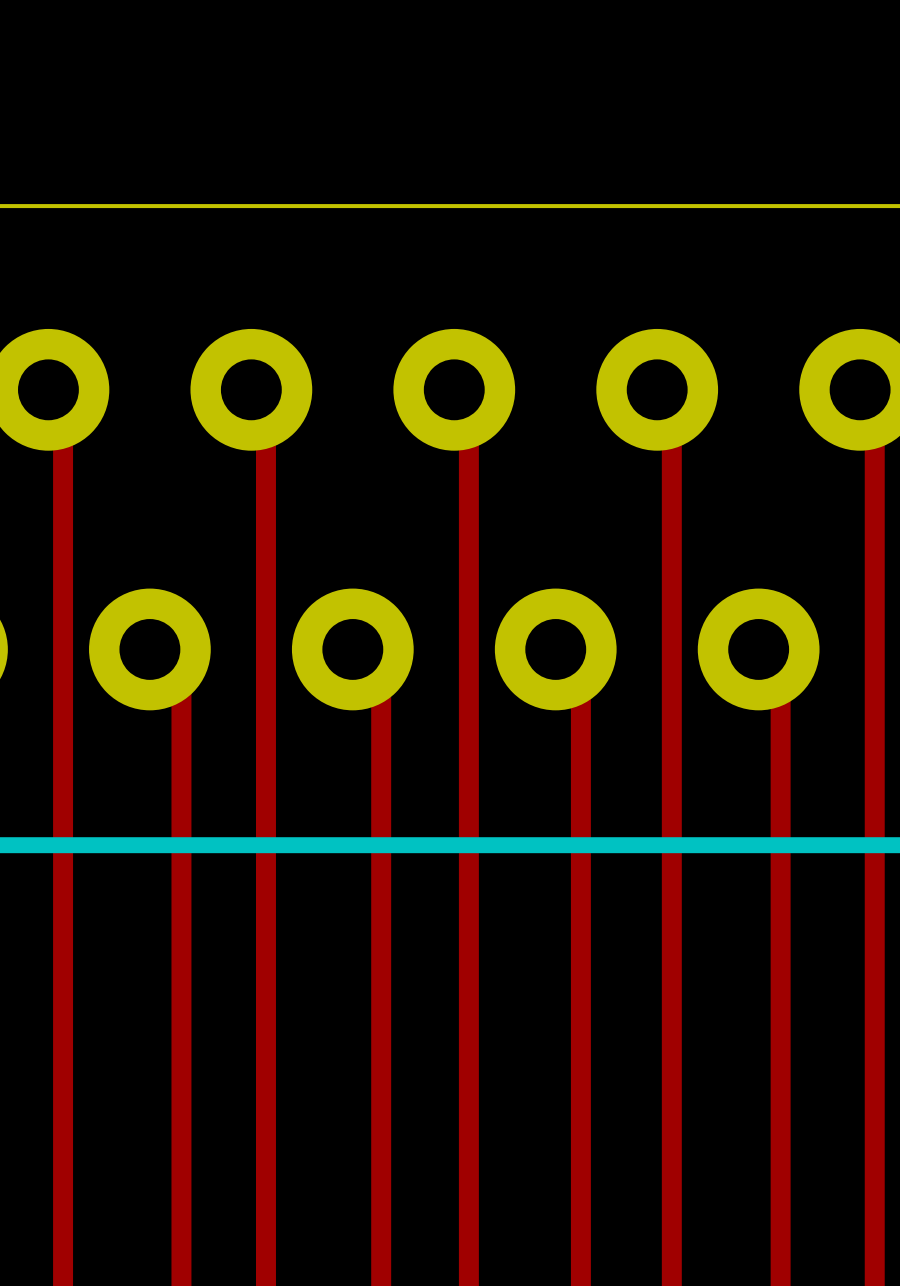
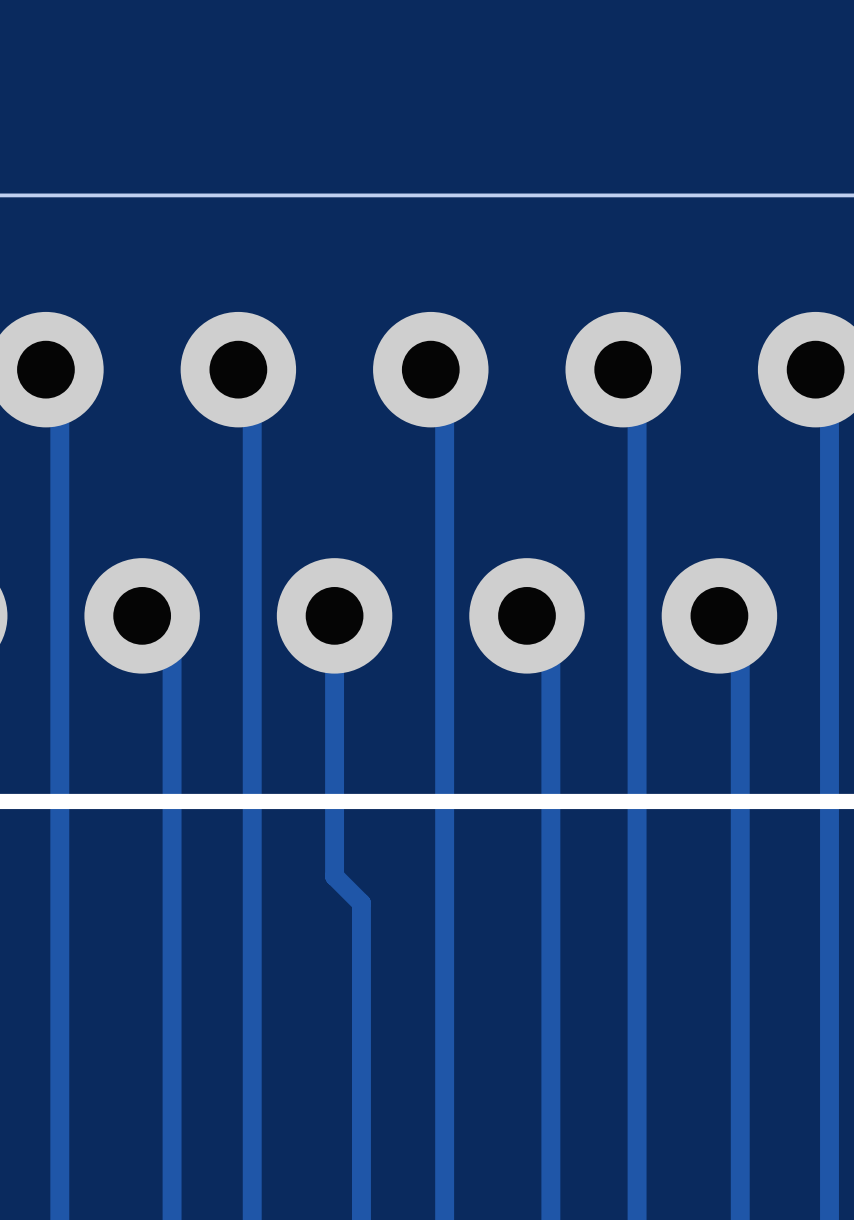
track: (381, 677) (381, 952) -> (334, 615) (334, 876) (361, 903)

